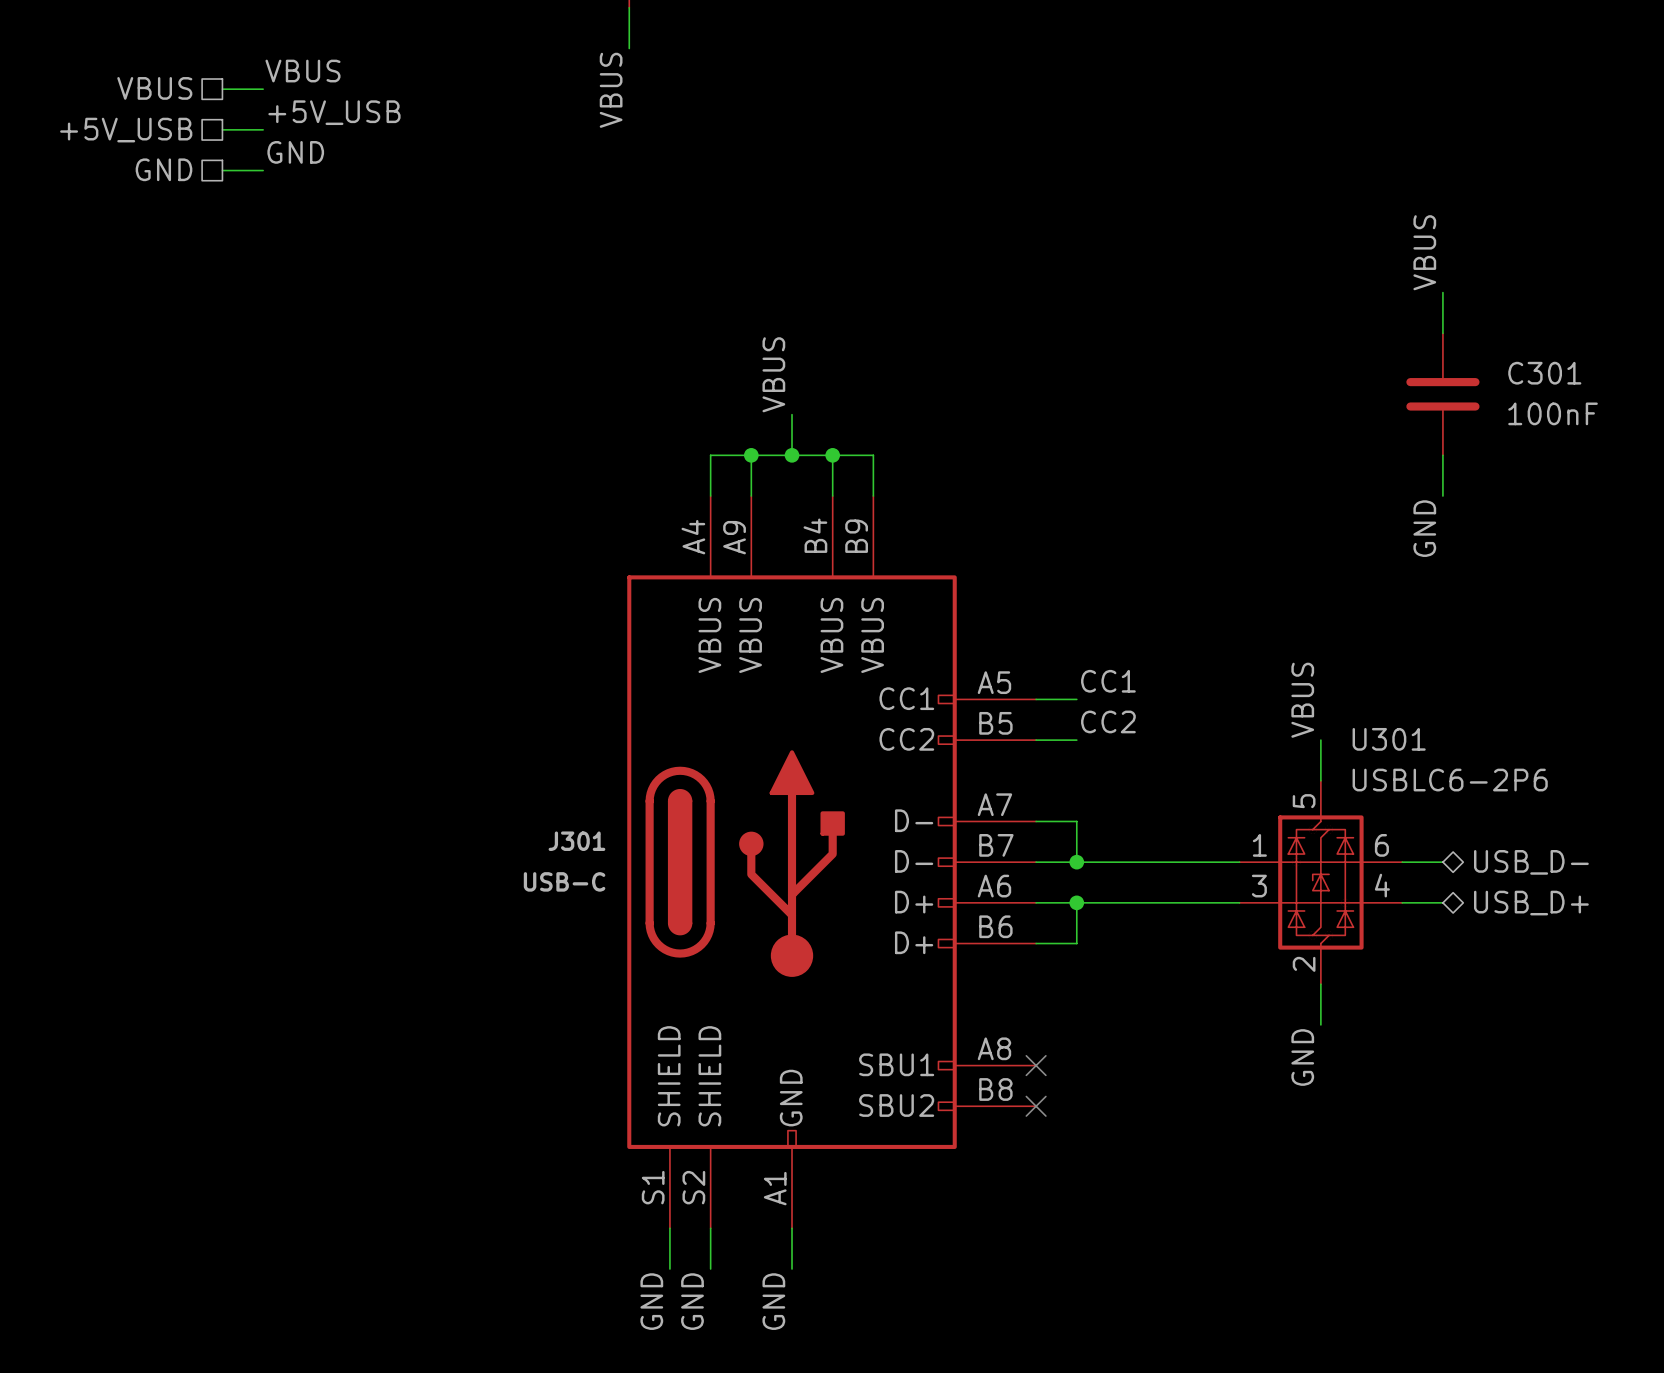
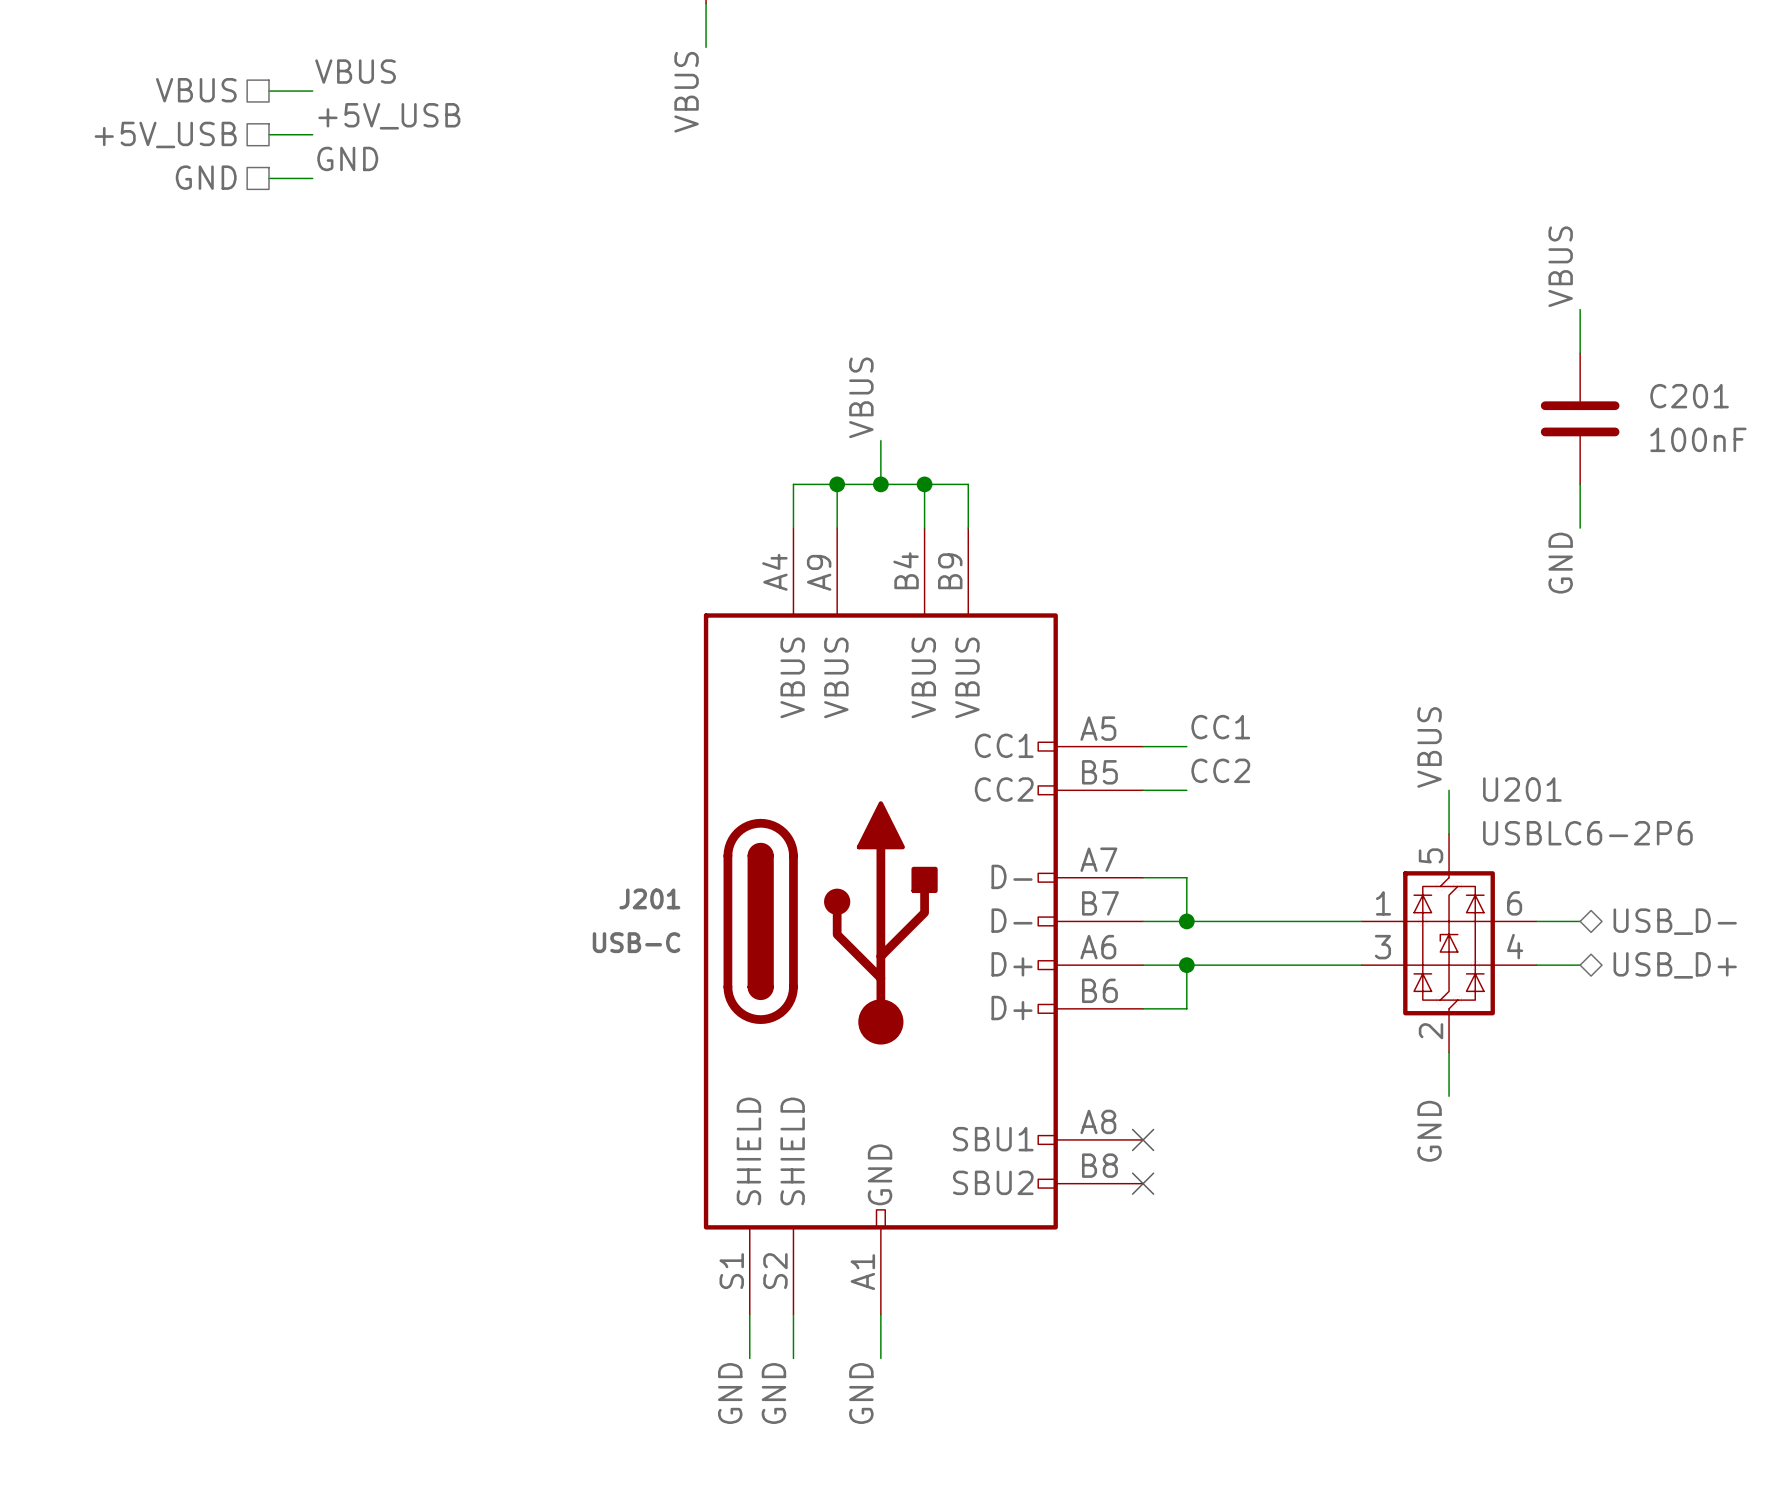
C301 name: C301 (1544, 373) -> C201 (1689, 396)
U301 name: U301 (1389, 739) -> U201 (1522, 789)
J301 name: J301 (576, 841) -> J201 (649, 898)

